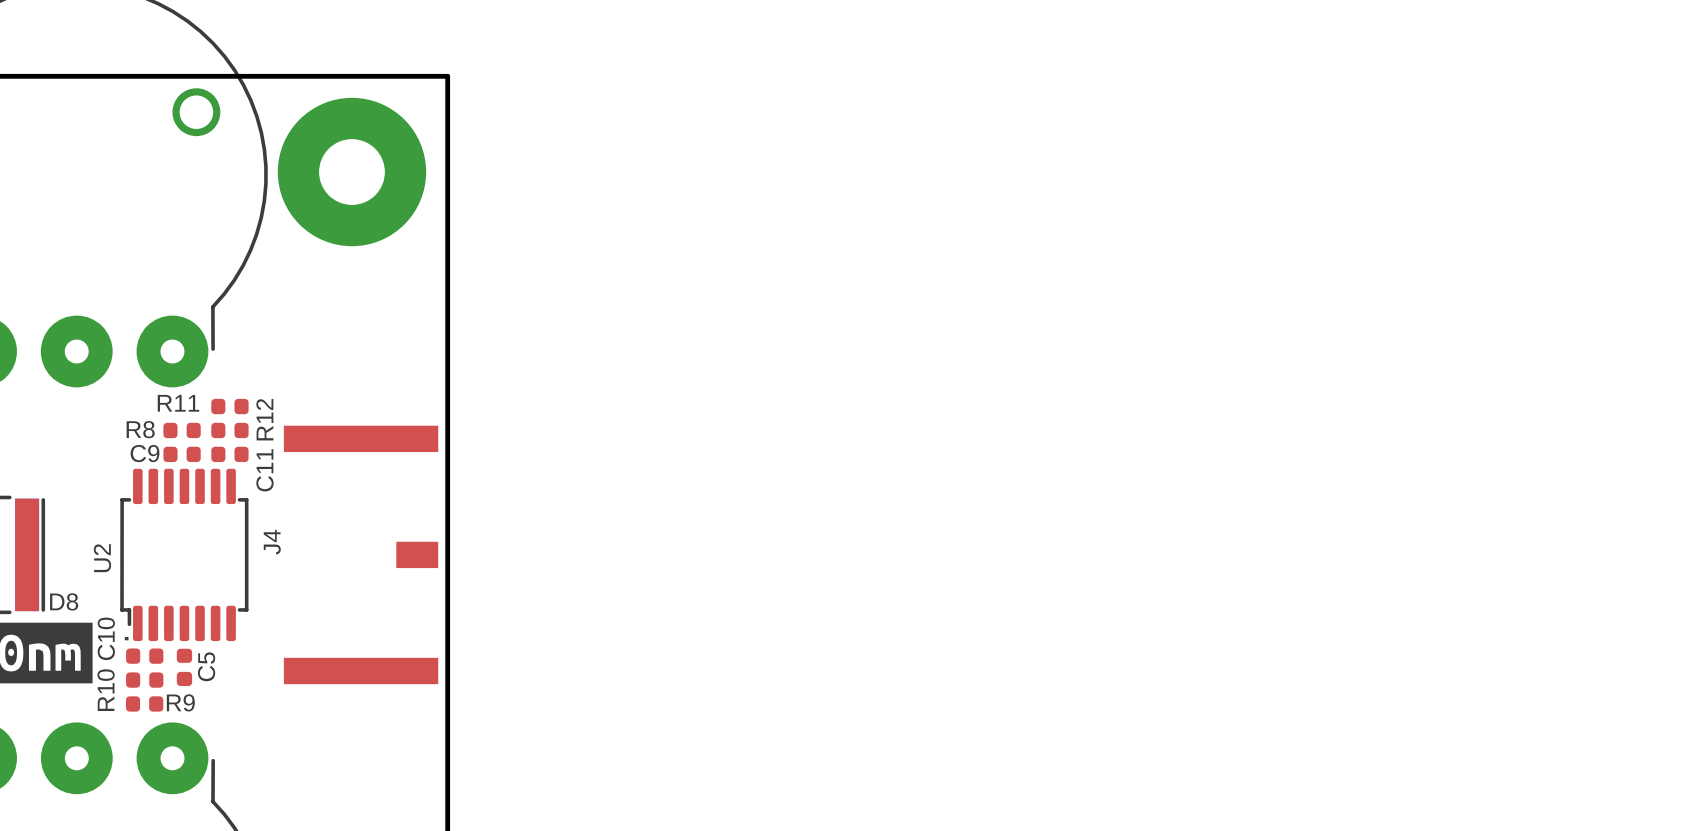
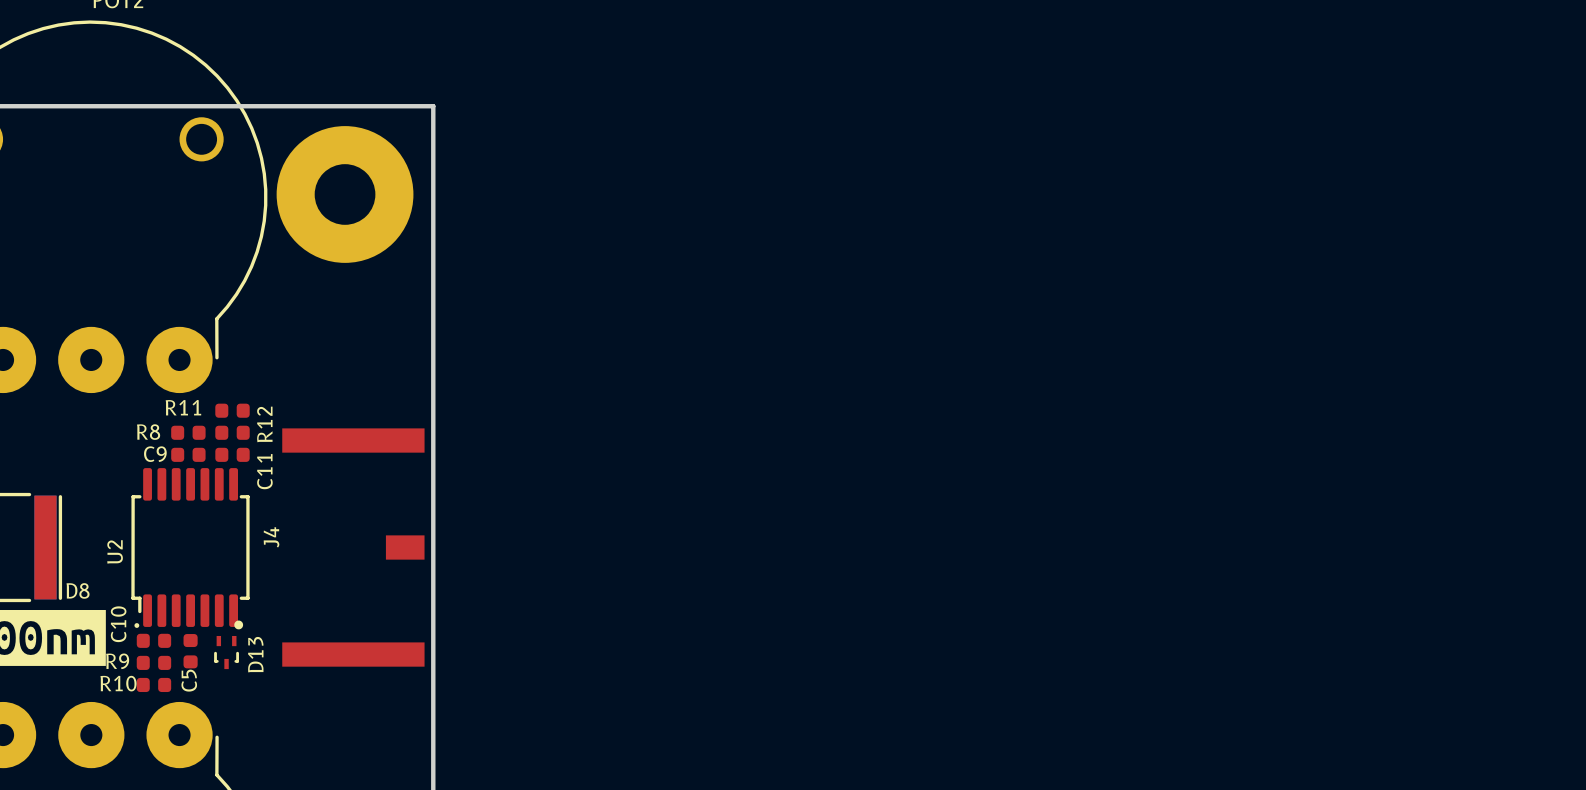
D13: none -> (228, 644)
C5 name position: C5 (206, 666) -> C5 (189, 680)
R10 name: R10 (106, 690) -> R9 (117, 661)
R9 name: R9 (180, 702) -> R10 (118, 683)

